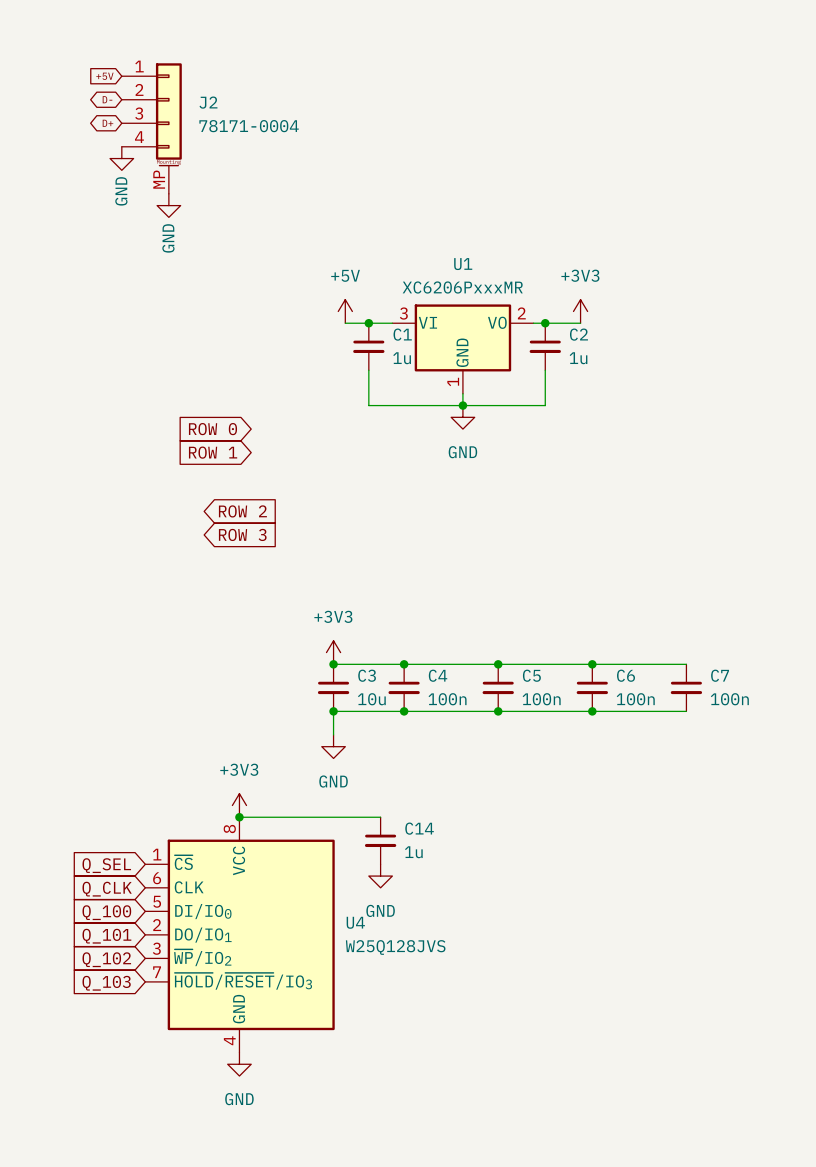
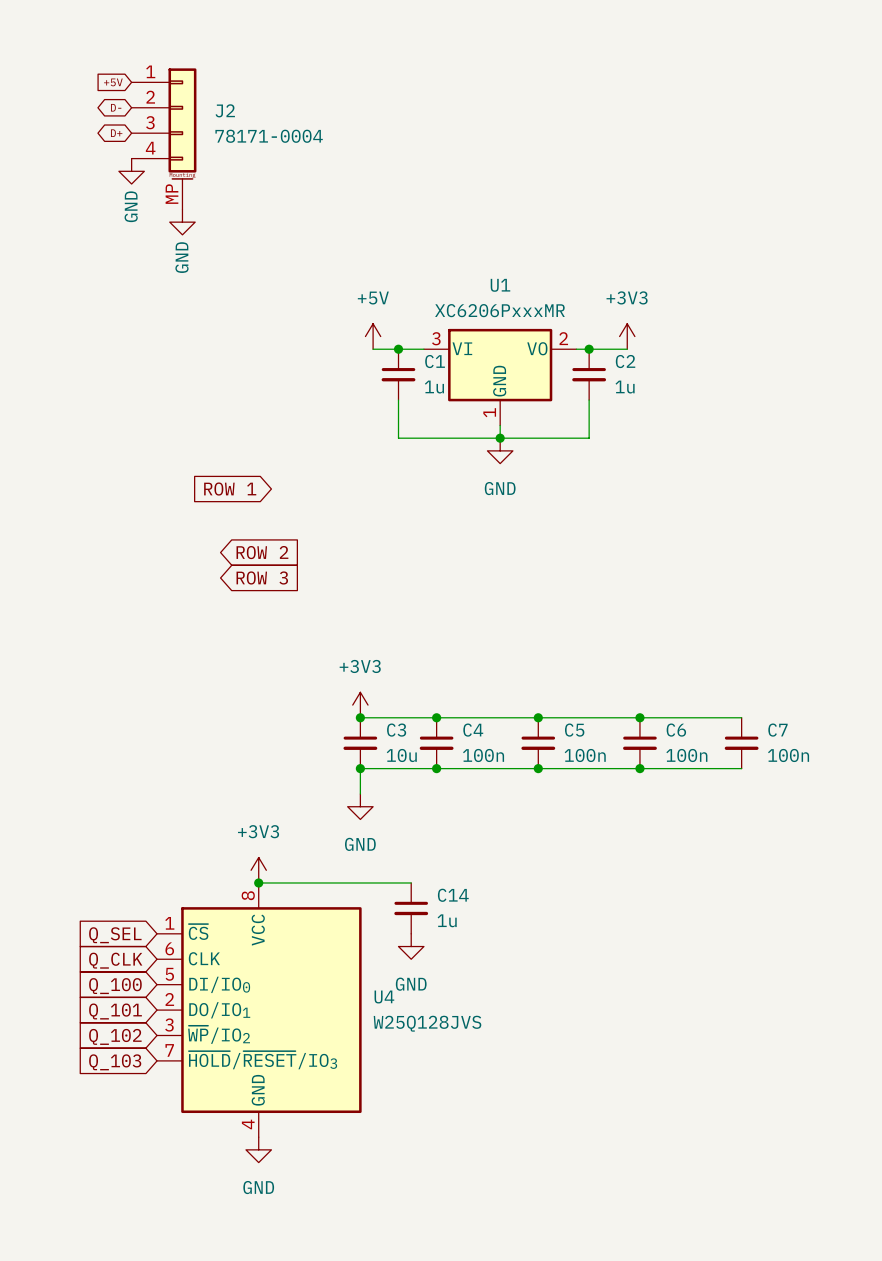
global label: ROW 0 (212, 429) -> none

